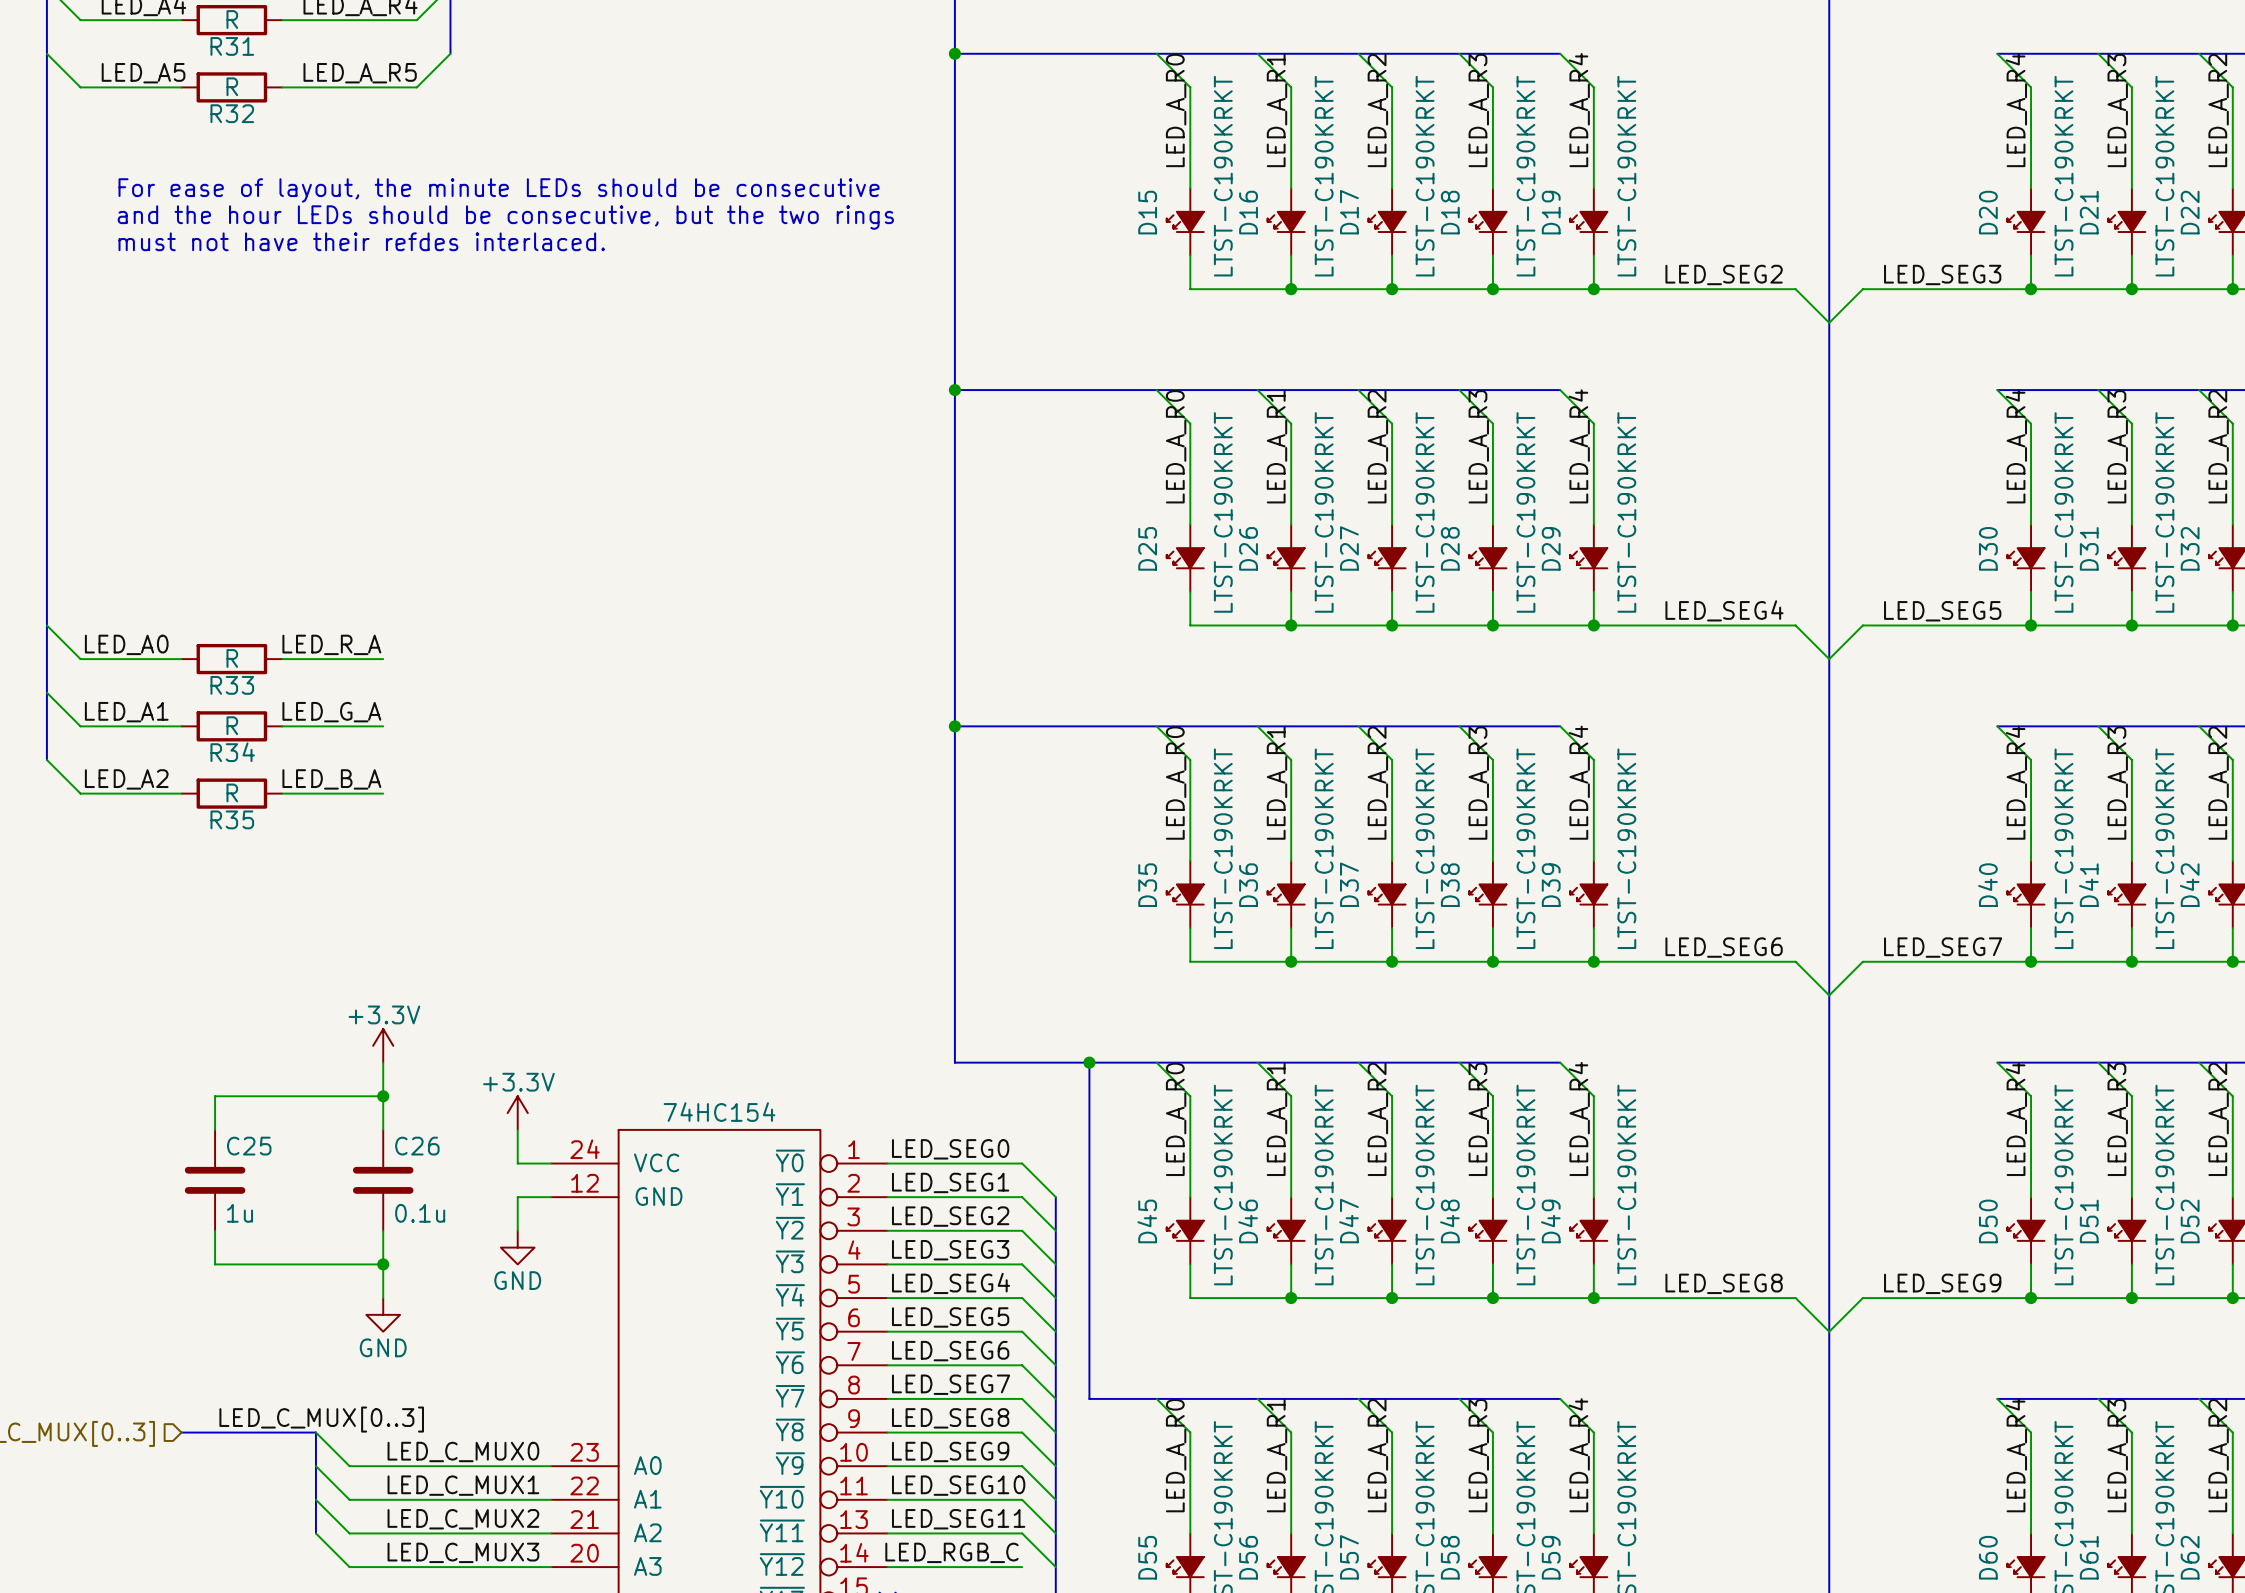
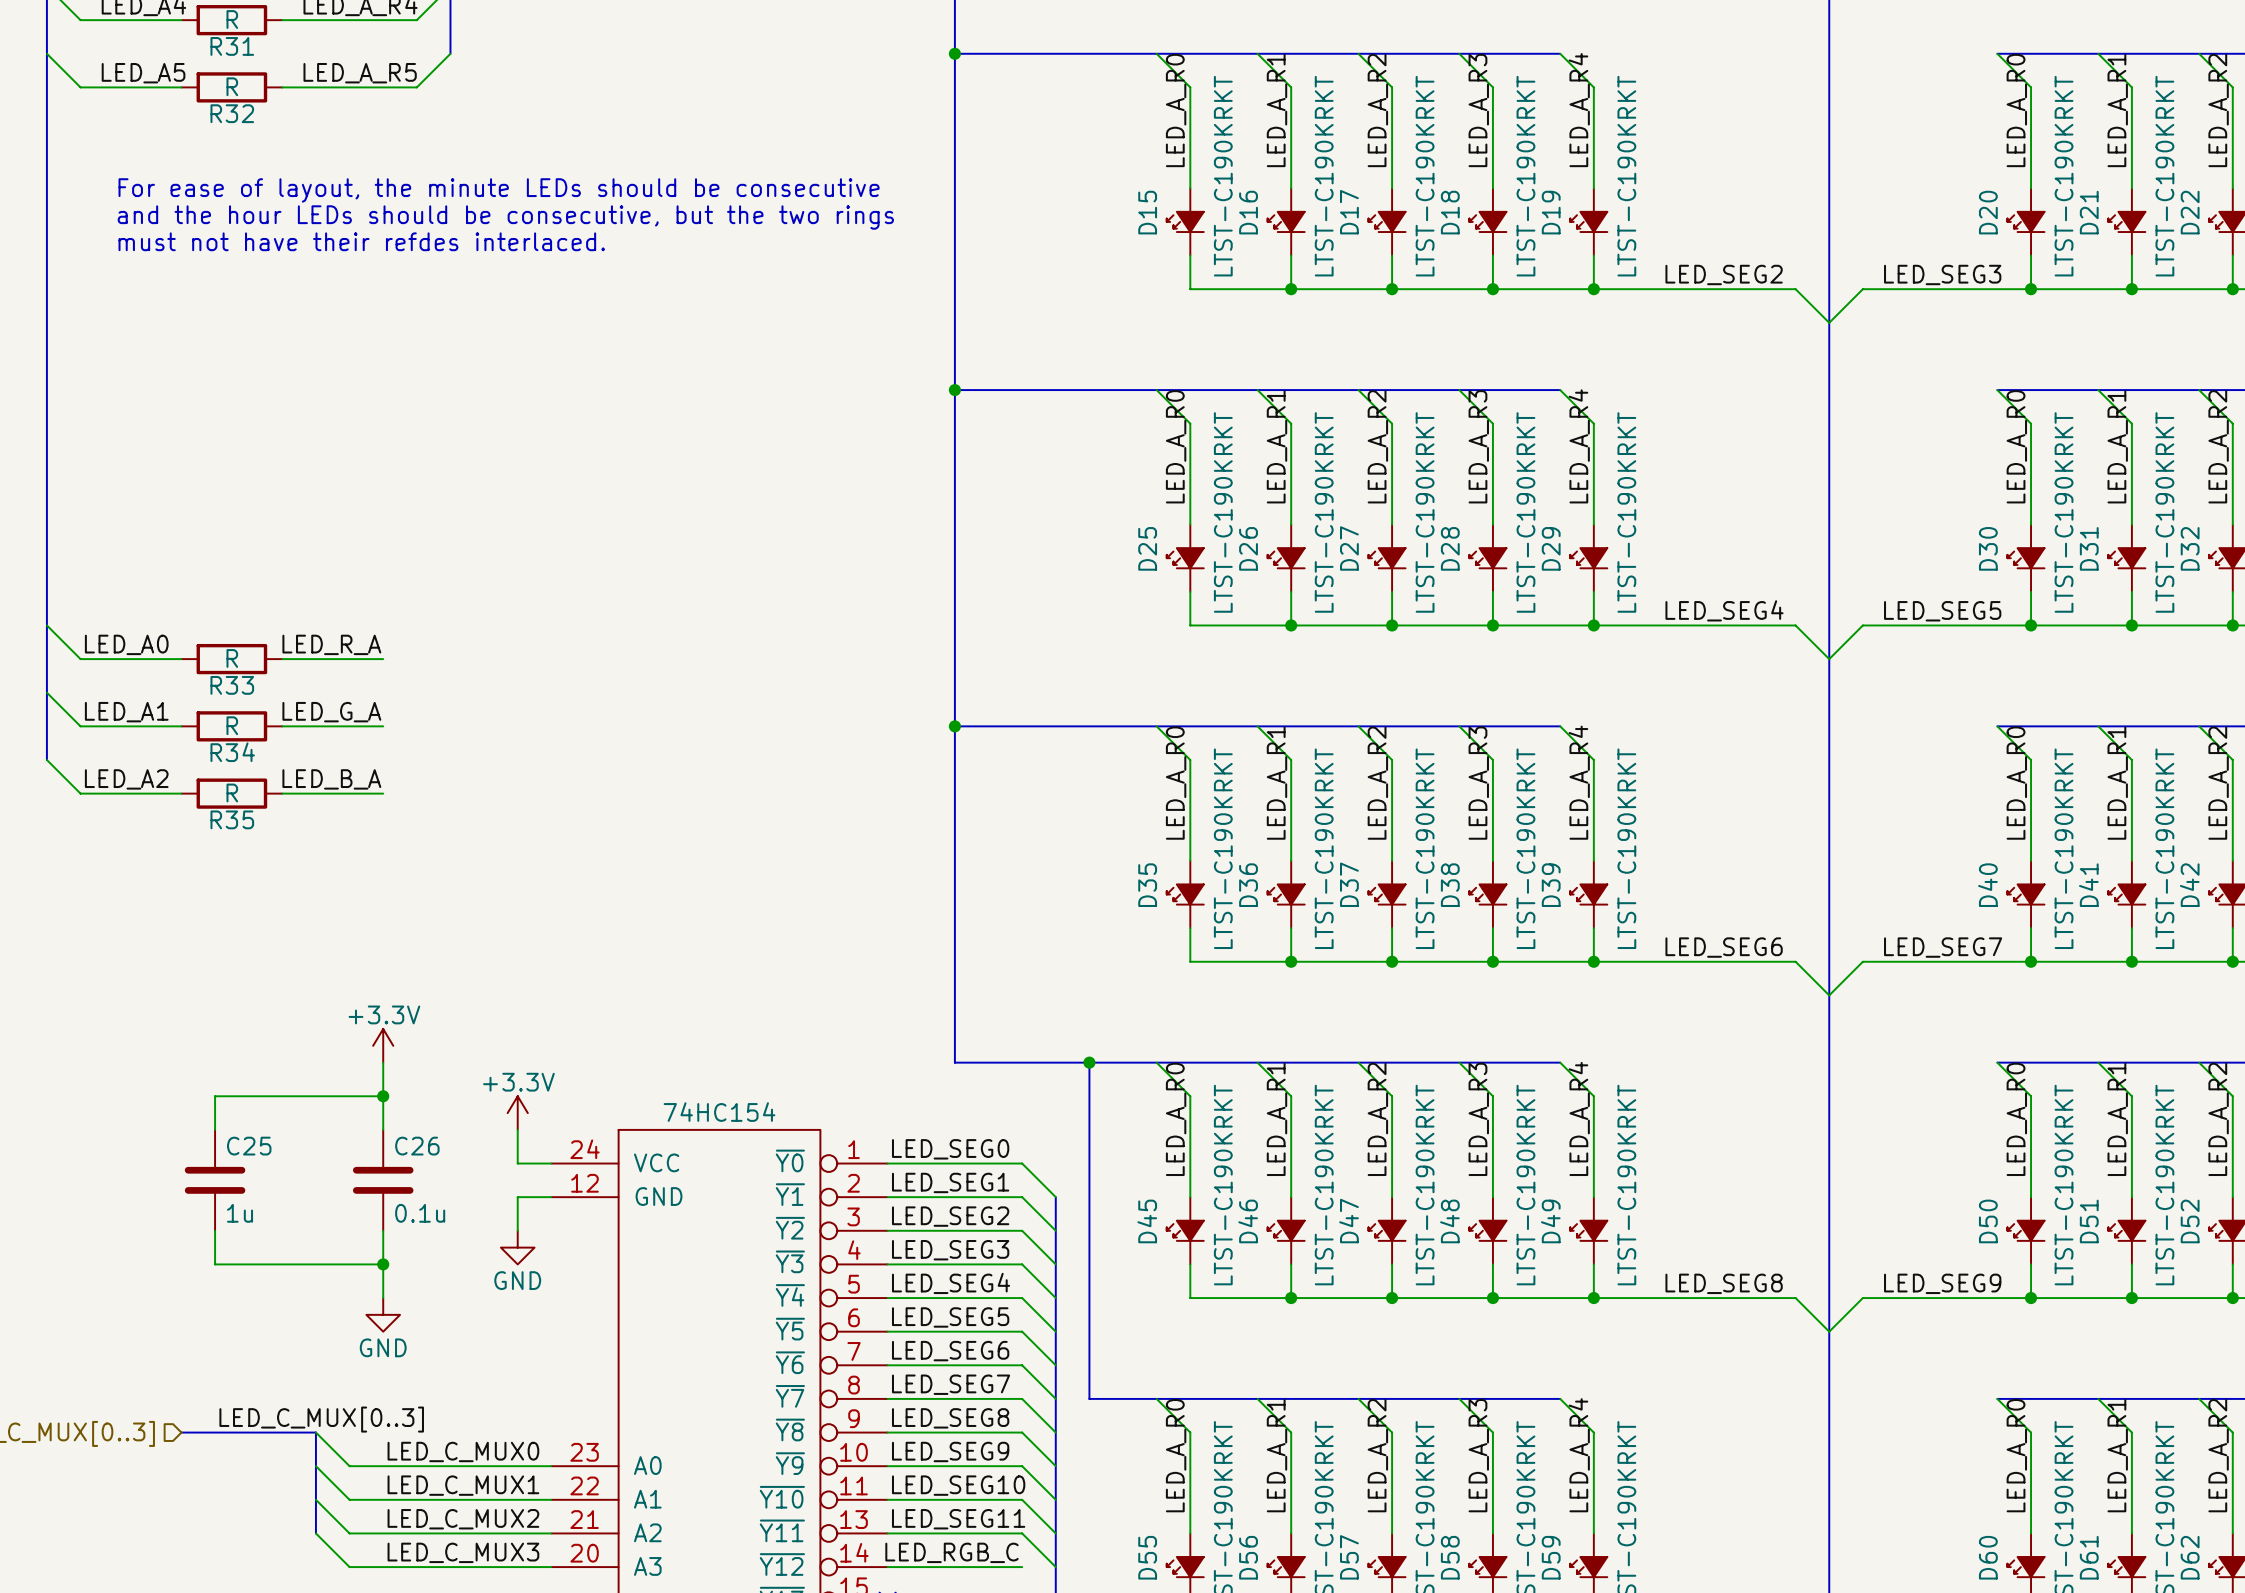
label: LED_A_R4 (2016, 110) -> LED_A_R0 (2016, 110)
label: LED_A_R3 (2117, 110) -> LED_A_R1 (2117, 110)
label: LED_A_R4 (2016, 446) -> LED_A_R0 (2016, 446)
label: LED_A_R3 (2117, 446) -> LED_A_R1 (2117, 446)
label: LED_A_R4 (2016, 782) -> LED_A_R0 (2016, 783)
label: LED_A_R3 (2117, 783) -> LED_A_R1 (2117, 783)
label: LED_A_R4 (2016, 1118) -> LED_A_R0 (2016, 1119)
label: LED_A_R3 (2117, 1119) -> LED_A_R1 (2117, 1119)
label: LED_A_R4 (2016, 1455) -> LED_A_R0 (2016, 1455)
label: LED_A_R3 (2117, 1455) -> LED_A_R1 (2117, 1455)

